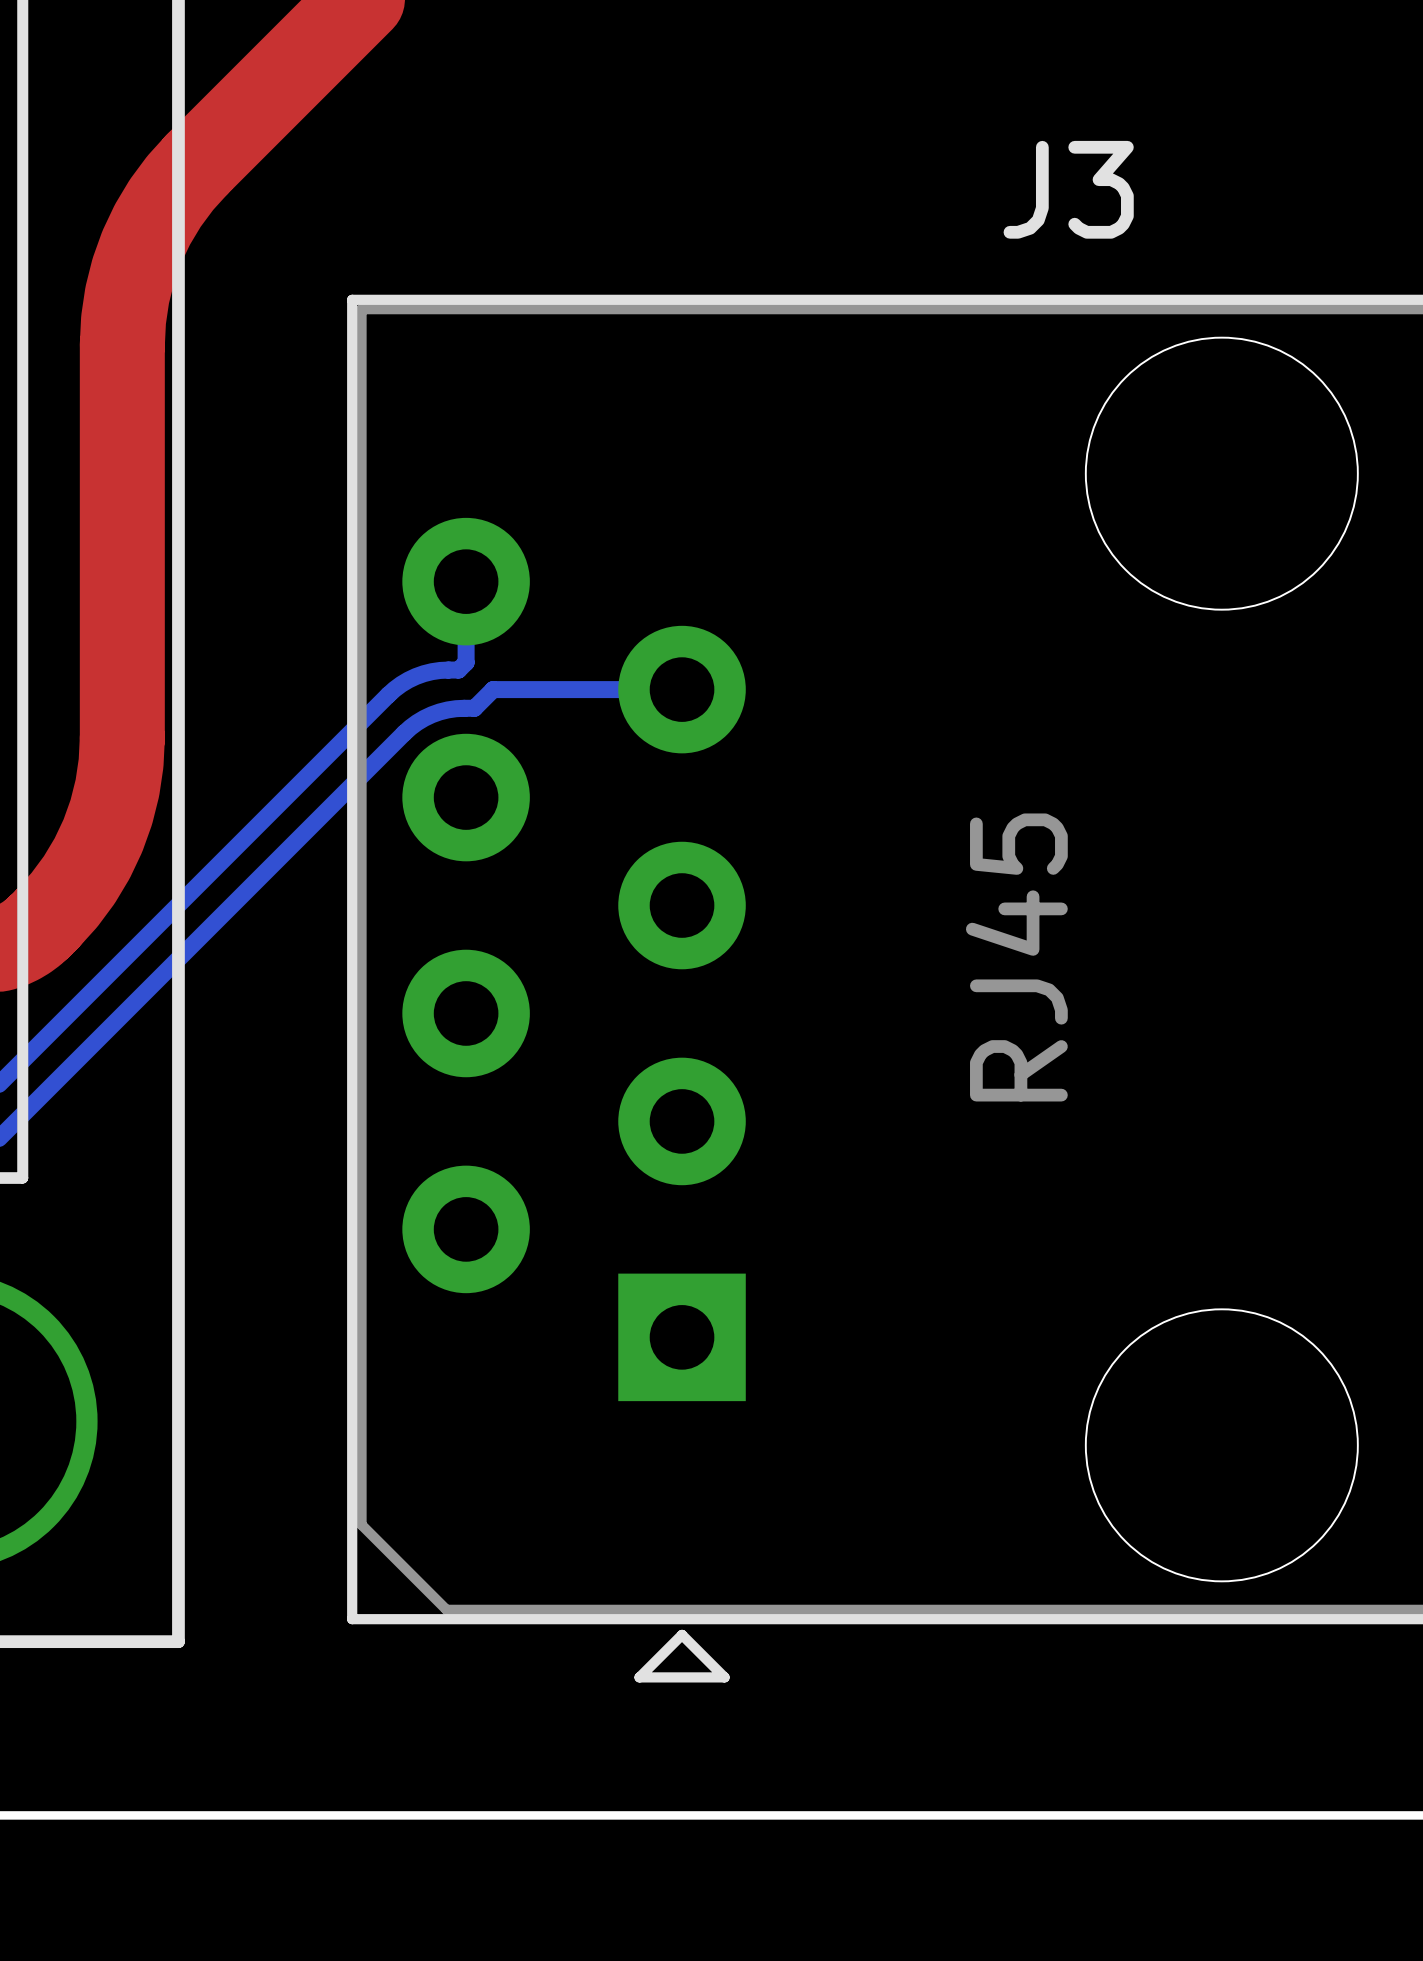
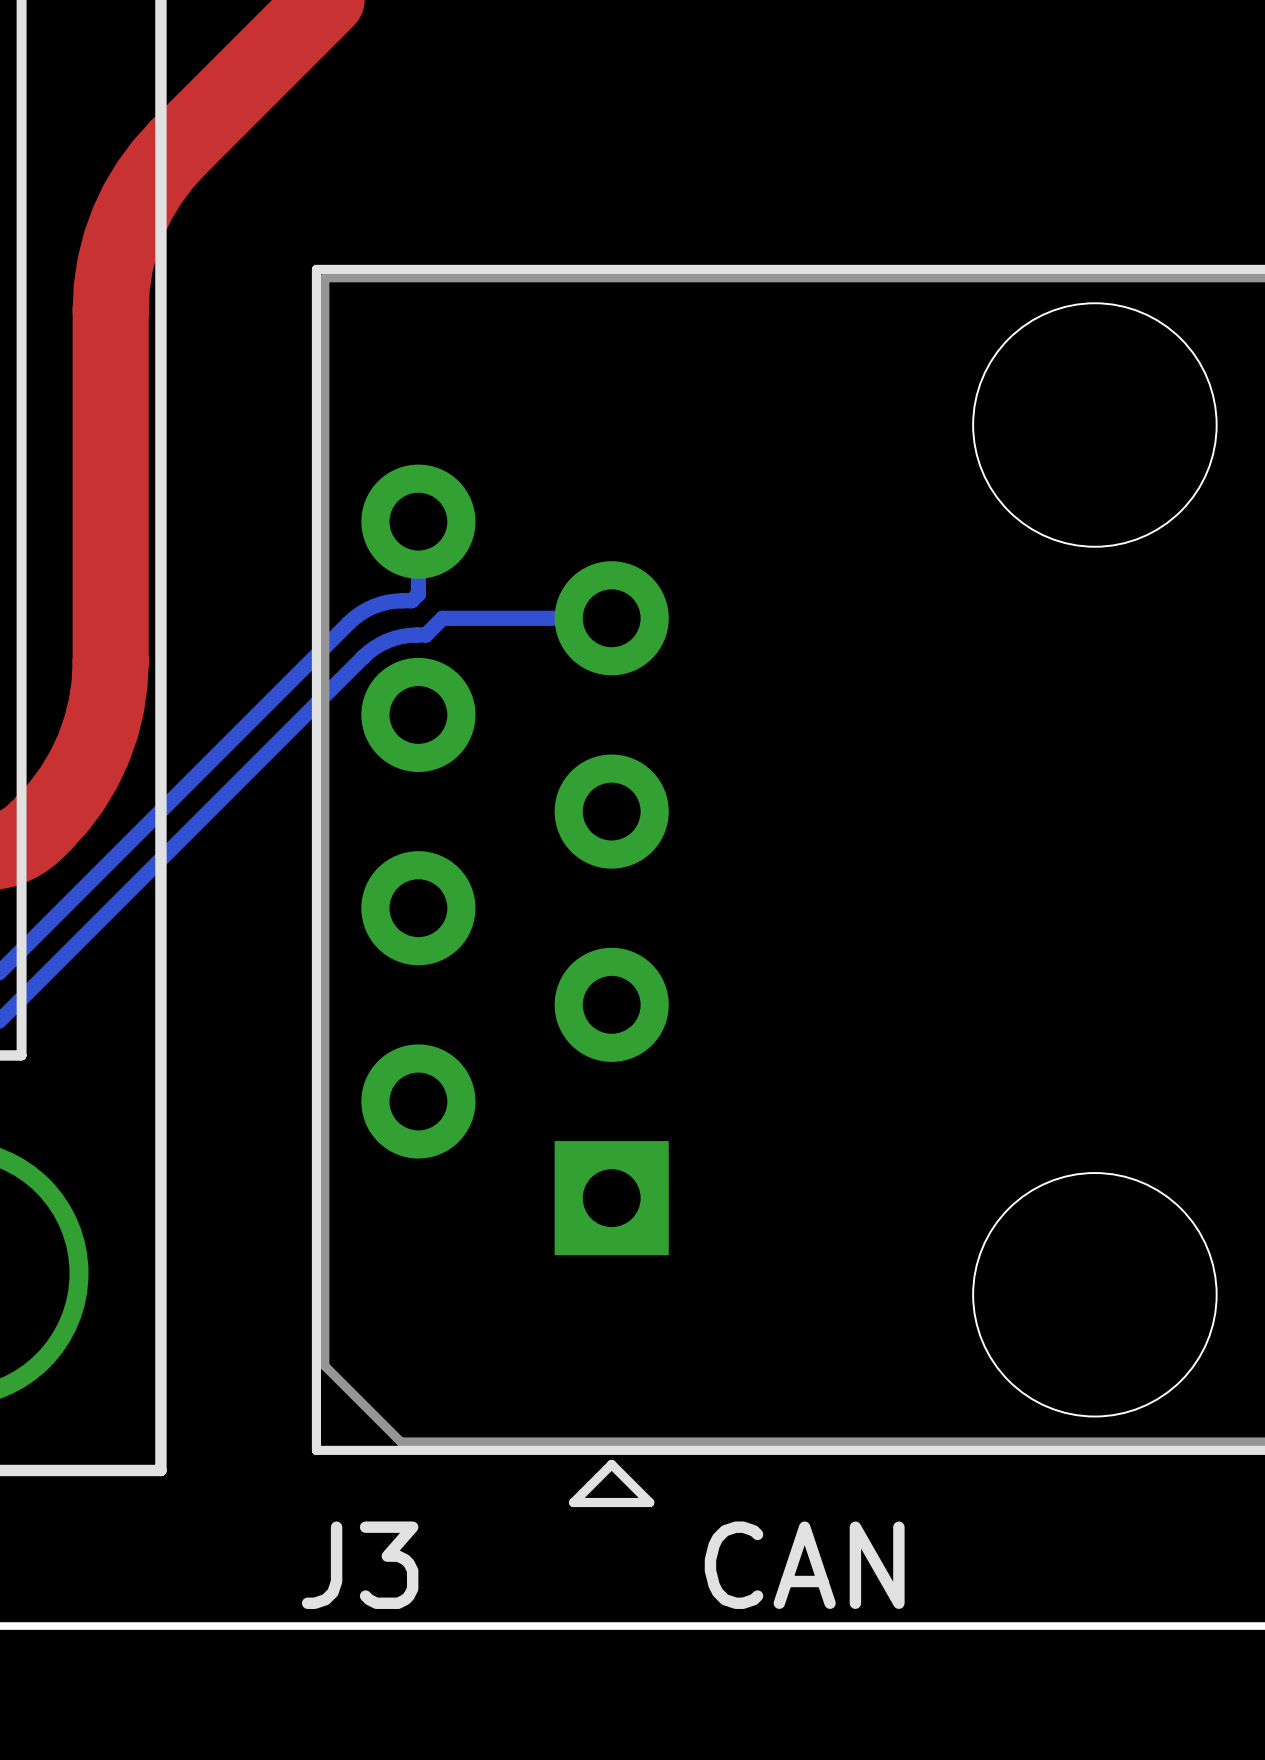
J3 name position: J3 (1068, 189) -> J3 (360, 1565)
J3 value: RJ45 (1016, 957) -> CAN (804, 1565)

